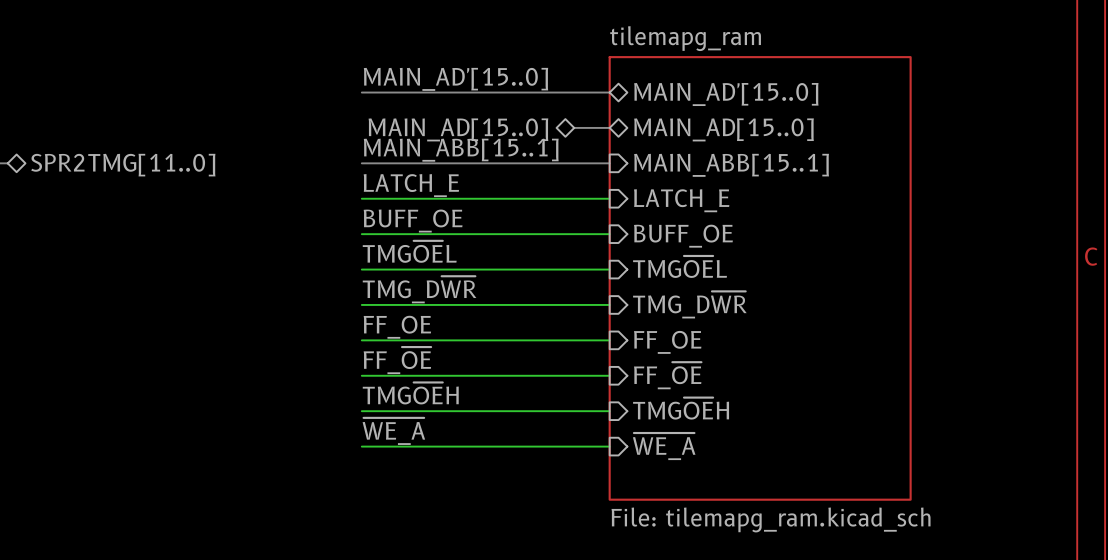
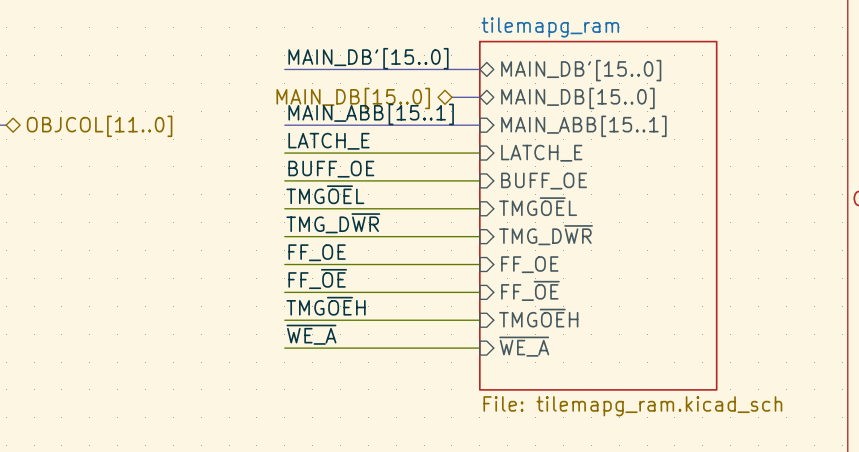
label: MAIN_AD'[15..0] (456, 79) -> MAIN_DB'[15..0] (368, 58)
sheet pin: MAIN_AD'[15..0] (726, 94) -> MAIN_DB'[15..0] (581, 70)
hierarchical label: MAIN_AD[15..0] (458, 129) -> MAIN_DB[15..0] (353, 98)
sheet pin: MAIN_AD[15..0] (724, 129) -> MAIN_DB[15..0] (577, 98)
hierarchical label: SPR2TMG[11..0] (123, 165) -> OBJCOL[11..0] (99, 126)

